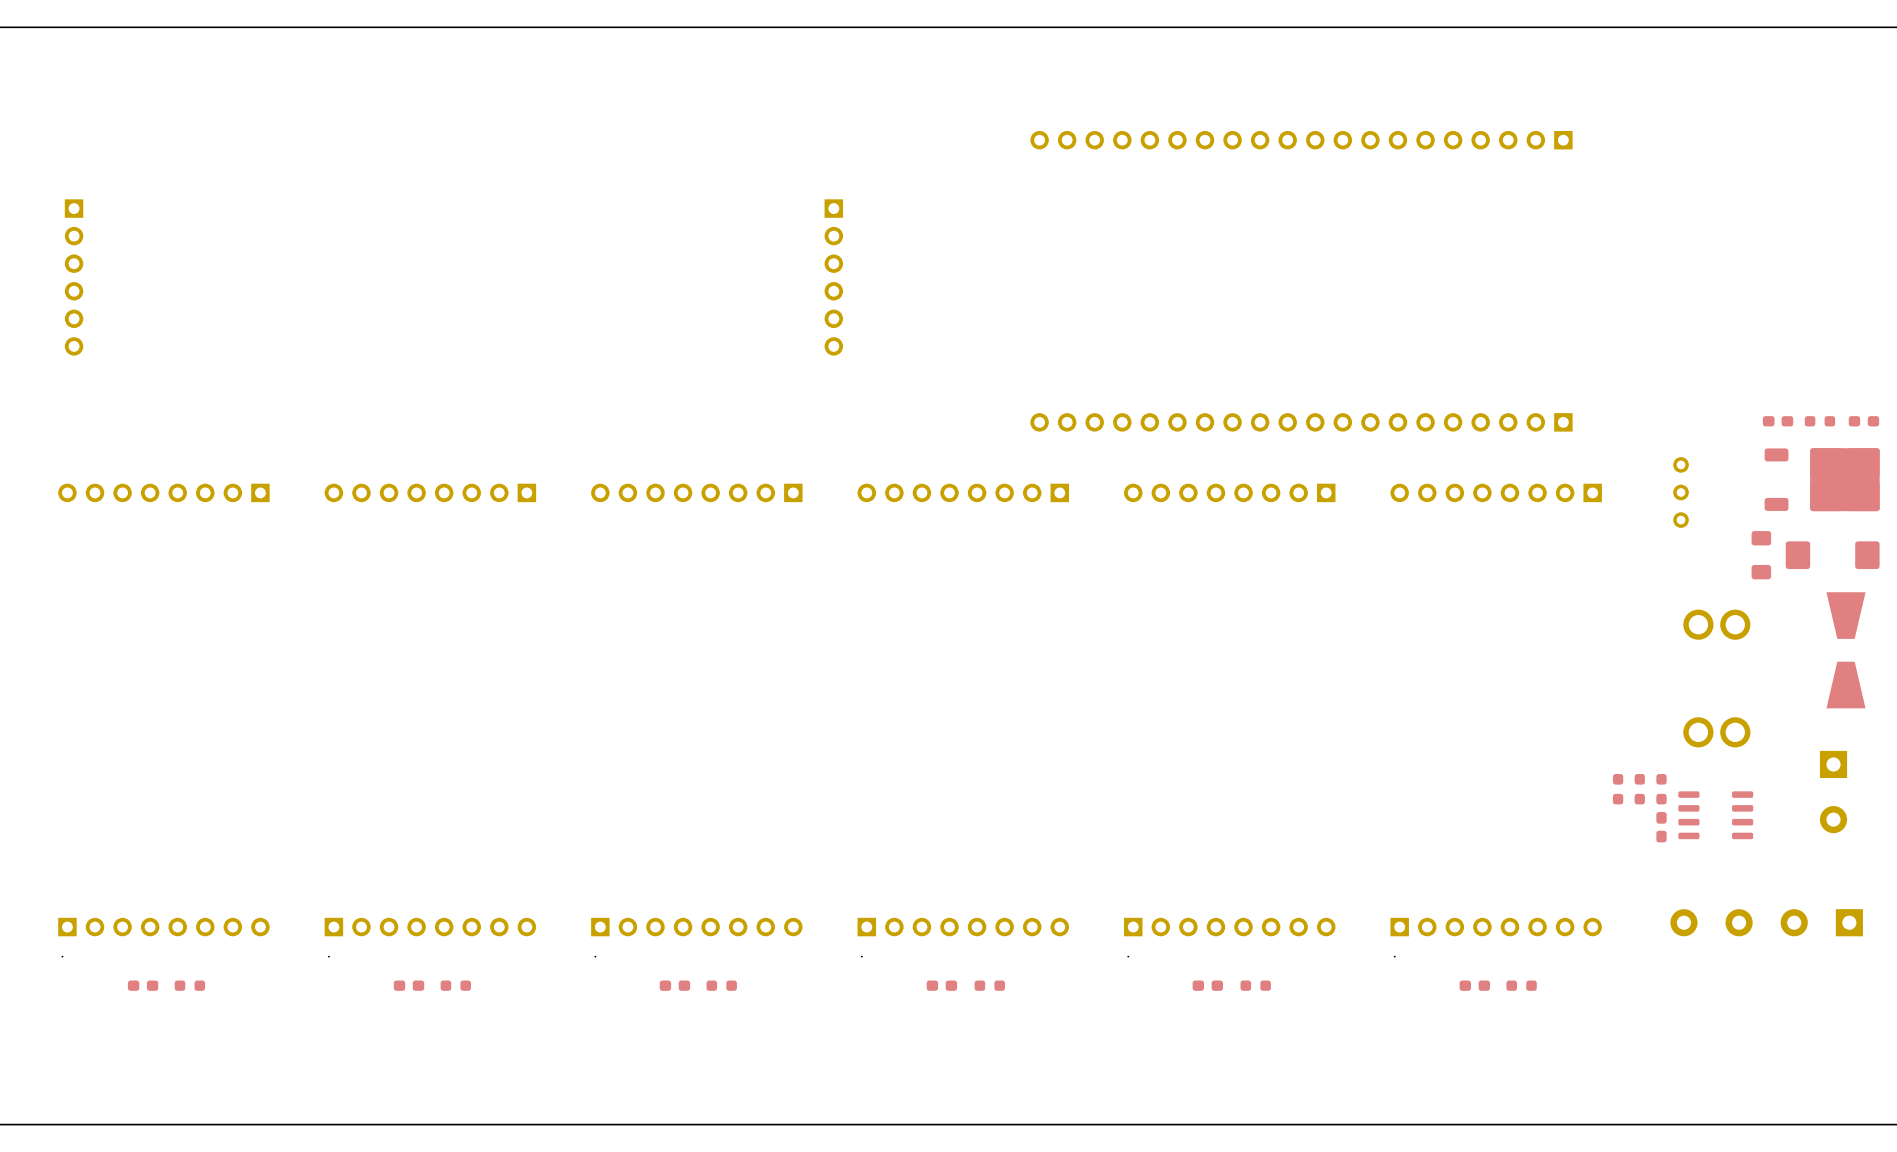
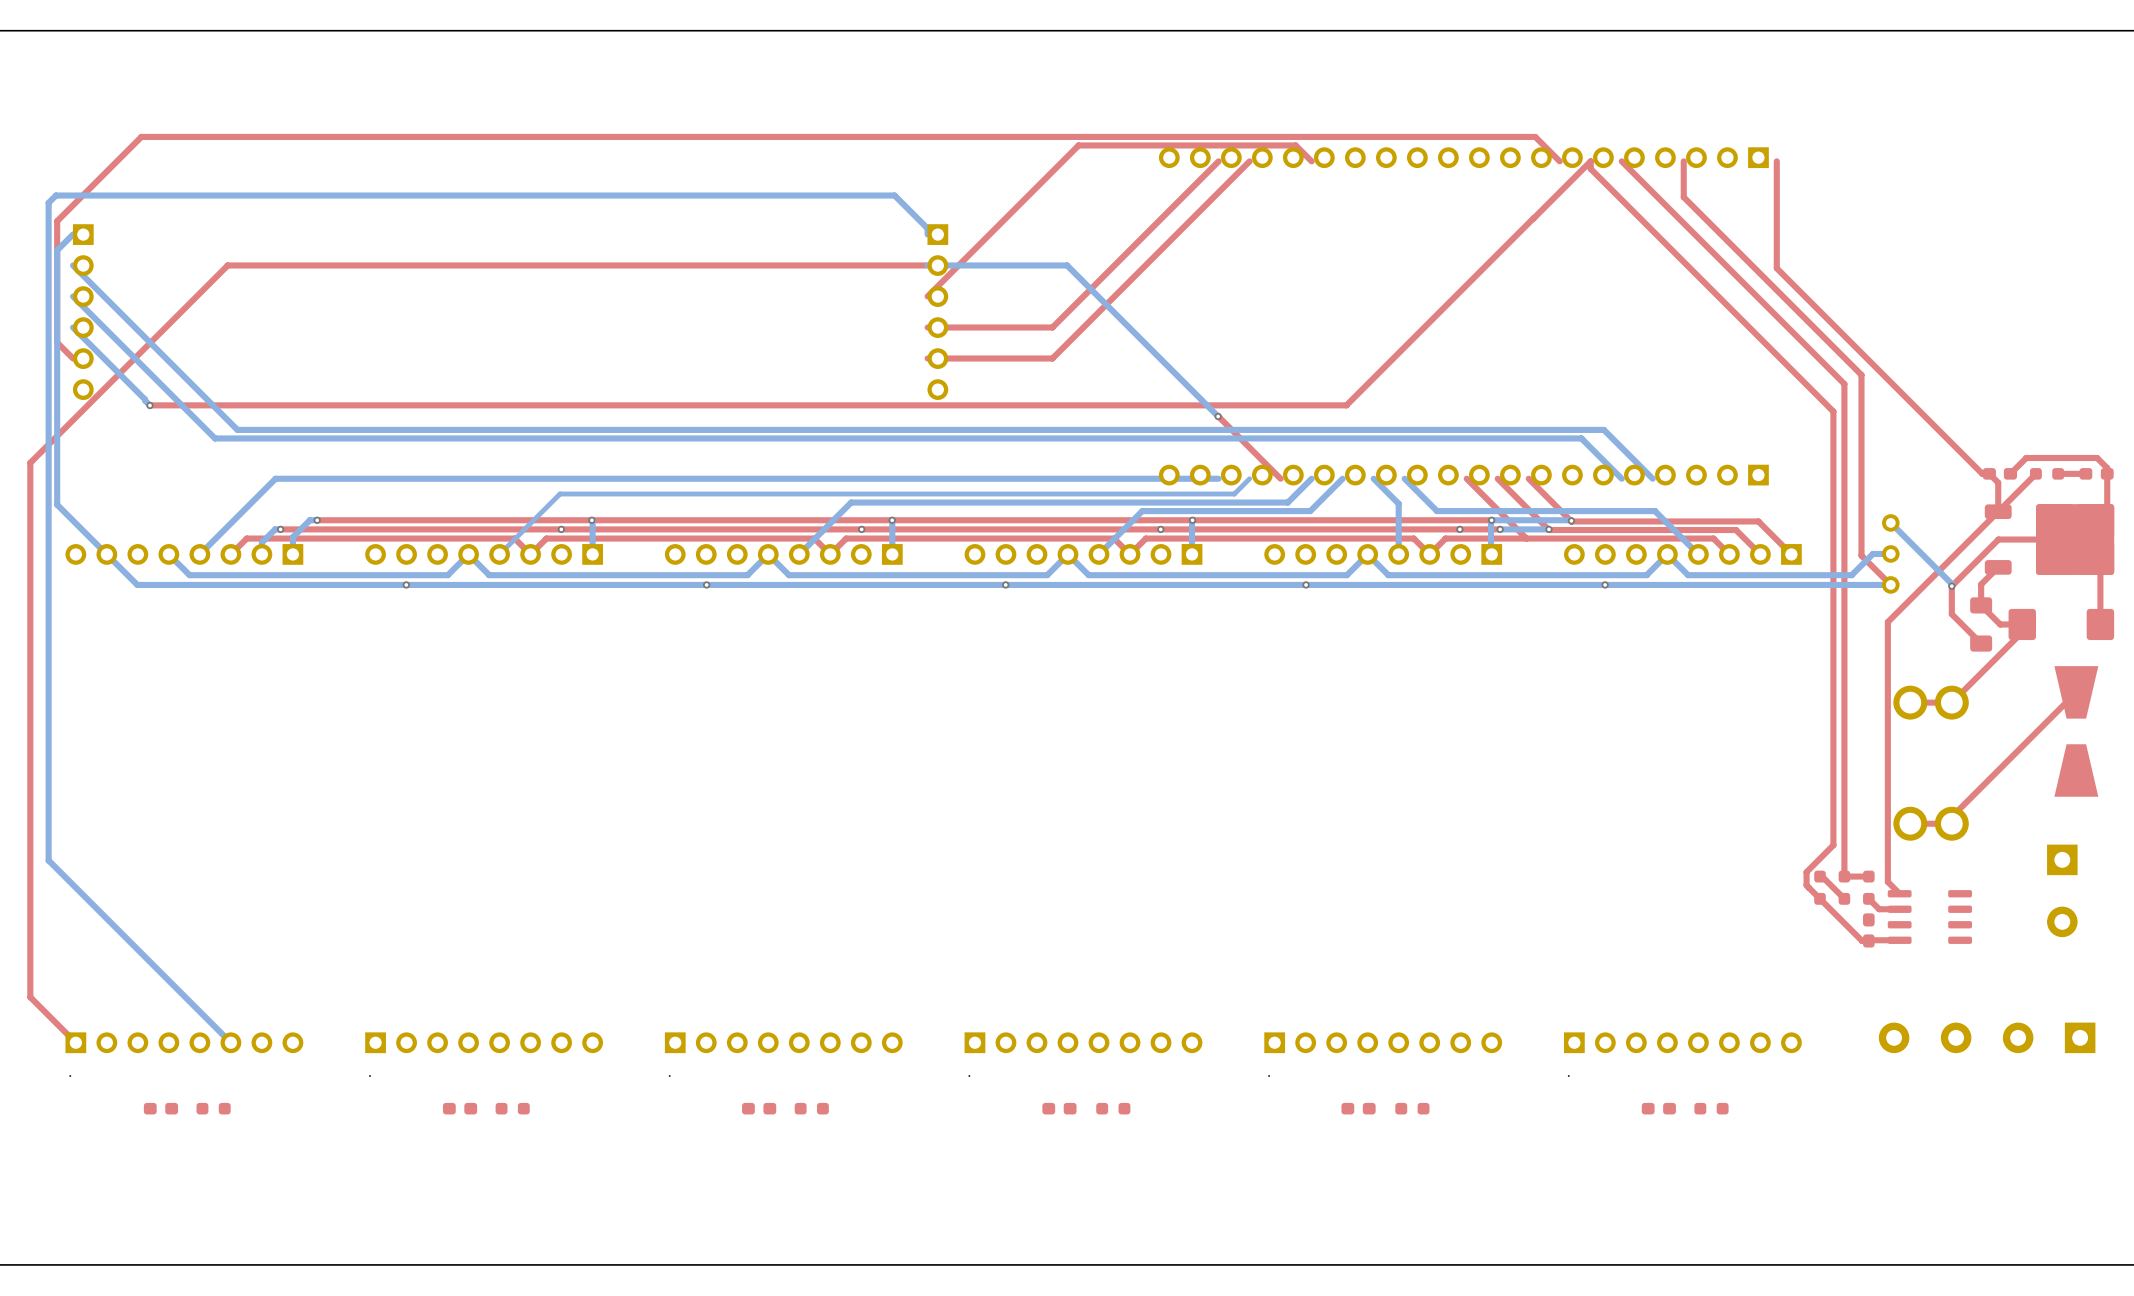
top track: none -> (1218, 161) (1052, 327) (927, 327)
top track: none -> (1249, 161) (1052, 358) (927, 358)
top track: none -> (1311, 161) (1295, 145) (1078, 145) (927, 296)
top track: none -> (1559, 161) (1535, 136) (141, 136) (57, 221) (57, 342) (73, 358)
top track: none -> (1621, 161) (1844, 384) (1844, 876) (1868, 876)
top track: none -> (1683, 161) (1683, 197) (1861, 374) (1861, 555) (1890, 584)
top track: none -> (1776, 161) (1776, 268) (1982, 473) (1989, 473) (1998, 482) (1998, 511)
bottom track: none -> (73, 234) (57, 250) (57, 504) (137, 584) (1890, 584)
bottom track: none -> (927, 234) (927, 228) (894, 195) (55, 195) (48, 202) (48, 860) (230, 1042)
bottom track: none -> (73, 265) (237, 429) (1603, 429) (1652, 478)
top track: none -> (927, 265) (227, 265) (30, 462) (30, 997) (75, 1042)
bottom track: none -> (927, 265) (1067, 265) (1218, 416)
bottom track: none -> (73, 296) (215, 438) (1581, 438) (1621, 478)
bottom track: none -> (73, 327) (149, 405)
top track: none -> (150, 405) (1346, 405) (1590, 161) (1590, 168) (1833, 411) (1833, 845) (1806, 872) (1806, 885) (1808, 887)
via: none -> (149, 405)
top track: none -> (1218, 416) (1280, 478)
via: none -> (1218, 416)
top track: none -> (2010, 473) (2026, 457) (2097, 457) (2107, 468) (2107, 509) (2095, 520)
top track: none -> (2035, 474) (1887, 622) (1887, 881) (1899, 893)
top track: none -> (2085, 473) (2058, 473)
bottom track: none -> (1218, 478) (275, 478) (199, 554)
bottom track: none -> (1249, 478) (1234, 494) (560, 494) (499, 554)
bottom track: none -> (1311, 478) (1287, 502) (851, 502) (799, 554)
bottom track: none -> (1342, 478) (1310, 511) (1142, 511) (1099, 554)
bottom track: none -> (1373, 478) (1398, 503) (1398, 554)
bottom track: none -> (1404, 478) (1437, 511) (1655, 511) (1698, 554)
top track: none -> (1466, 478) (1526, 538)
top track: none -> (1497, 478) (1548, 530)
top track: none -> (1528, 478) (1571, 521)
bottom track: none -> (317, 520) (309, 520) (292, 537) (292, 554)
via: none -> (317, 520)
bottom track: none -> (591, 520) (592, 554)
via: none -> (591, 520)
bottom track: none -> (892, 520) (892, 554)
via: none -> (892, 520)
bottom track: none -> (1192, 520) (1192, 554)
via: none -> (1192, 520)
top track: none -> (1491, 520) (317, 520)
via: none -> (1491, 520)
top track: none -> (1571, 521) (1758, 521) (1791, 554)
bottom track: none -> (1571, 520) (1491, 520) (1491, 554)
via: none -> (1571, 520)
bottom track: none -> (1890, 522) (1951, 583) (1951, 586)
bottom track: none -> (280, 529) (275, 529) (261, 542) (261, 554)
via: none -> (280, 529)
via: none -> (561, 529)
via: none -> (861, 529)
via: none -> (1160, 529)
via: none -> (1459, 529)
top track: none -> (1500, 529) (280, 529)
via: none -> (1500, 529)
bottom track: none -> (1548, 529) (1500, 529)
via: none -> (1548, 529)
top track: none -> (1548, 530) (1736, 530) (1760, 554)
top track: none -> (1729, 554) (1713, 538) (1445, 538) (1429, 554) (1413, 538) (1145, 538) (1130, 554) (1114, 538) (846, 538) (830, 554) (814, 538) (546, 538) (530, 554) (514, 538) (246, 538) (230, 554)
bottom track: none -> (1890, 553) (1872, 553) (1851, 575) (1688, 575) (1667, 554) (1646, 575) (1388, 575) (1367, 554) (1346, 575) (1088, 575) (1067, 554) (1047, 575) (789, 575) (768, 554) (747, 575) (489, 575) (468, 554) (447, 575) (189, 575) (168, 554)
top track: none -> (1998, 567) (1981, 584) (1981, 605) (2000, 624) (2022, 624) (2022, 632) (1951, 702) (1910, 702)
via: none -> (406, 584)
via: none -> (706, 584)
via: none -> (1005, 584)
via: none -> (1306, 584)
via: none -> (1605, 584)
via: none -> (1951, 586)
top track: none -> (2100, 624) (2100, 564) (2075, 539) (1998, 539) (1951, 586) (1951, 614) (1981, 643)
top track: none -> (2076, 692) (1951, 816) (1951, 823) (1910, 823)
top track: none -> (1819, 876) (1844, 898)
top track: none -> (1808, 887) (1862, 940) (1899, 940)
top track: none -> (1868, 898) (1879, 909) (1899, 909)

